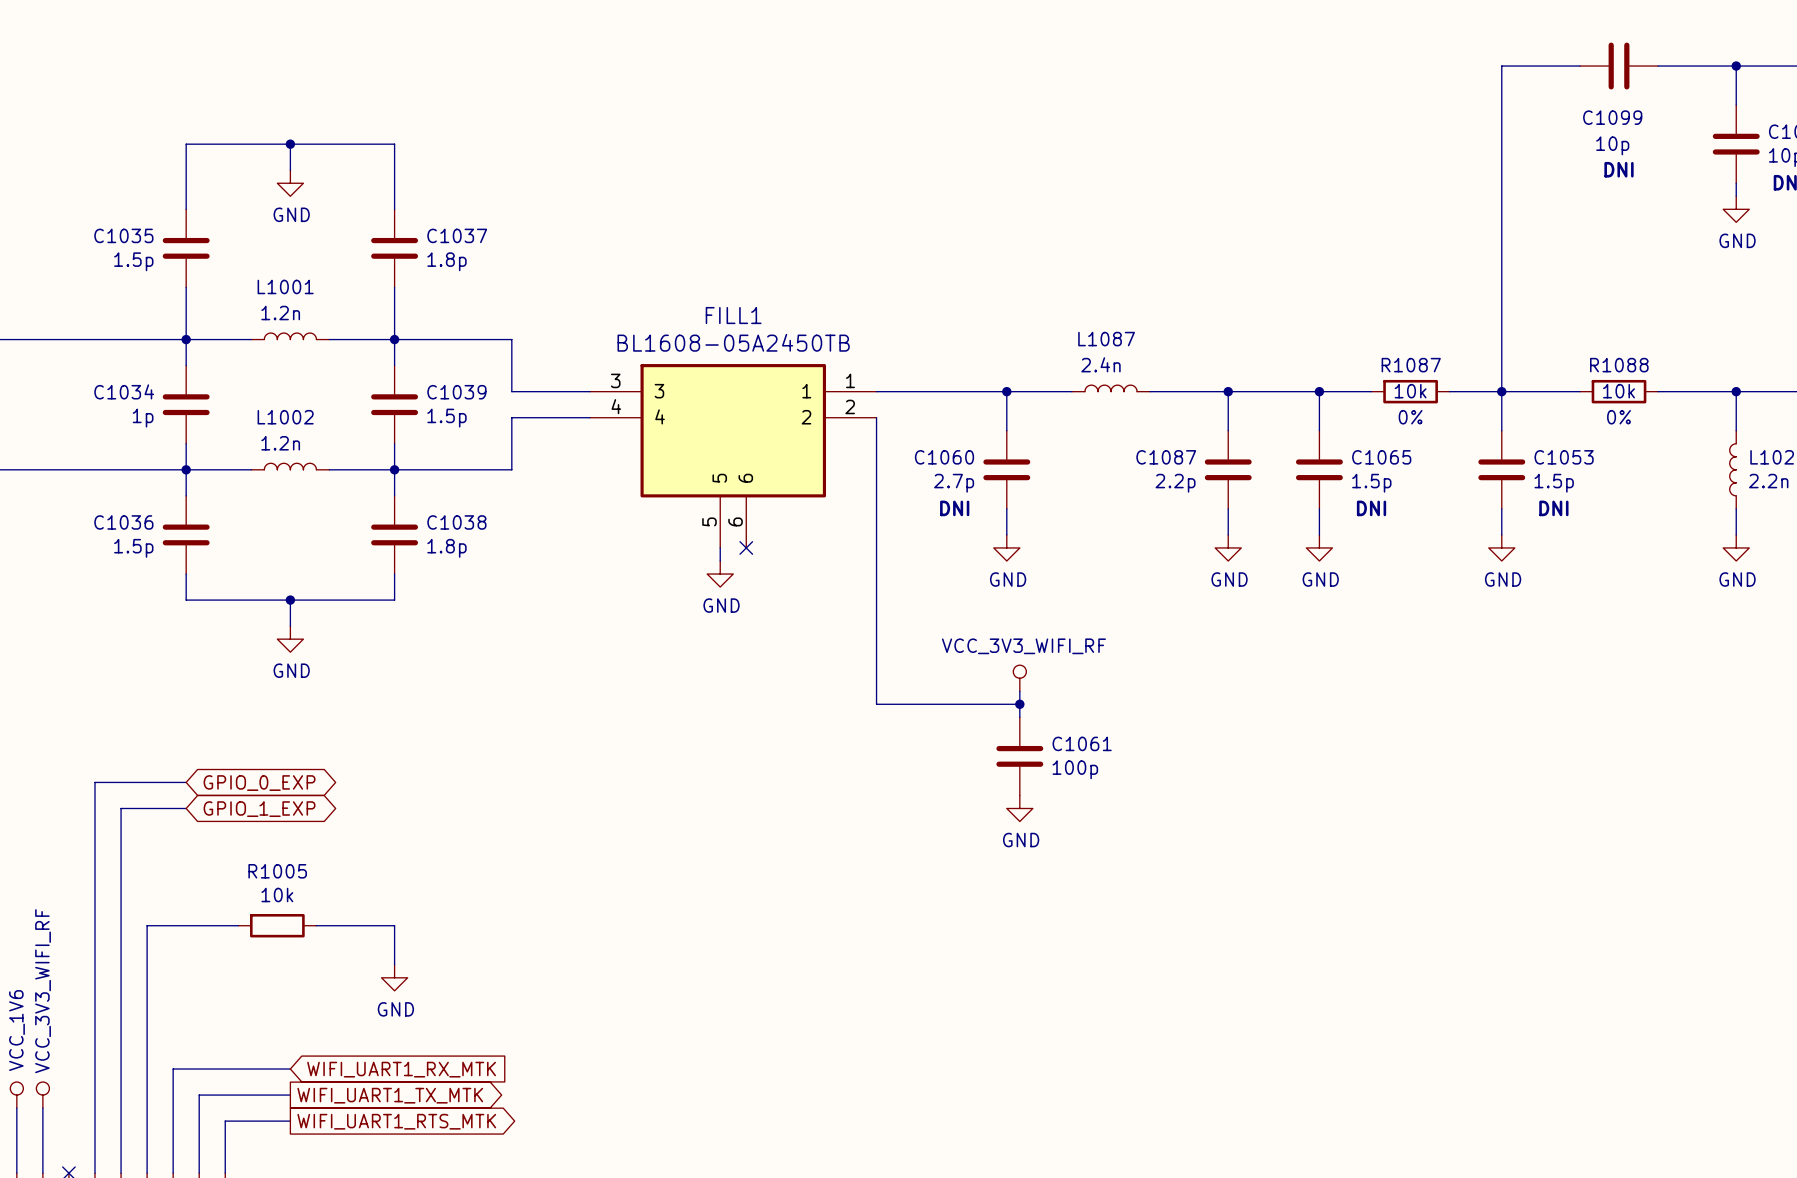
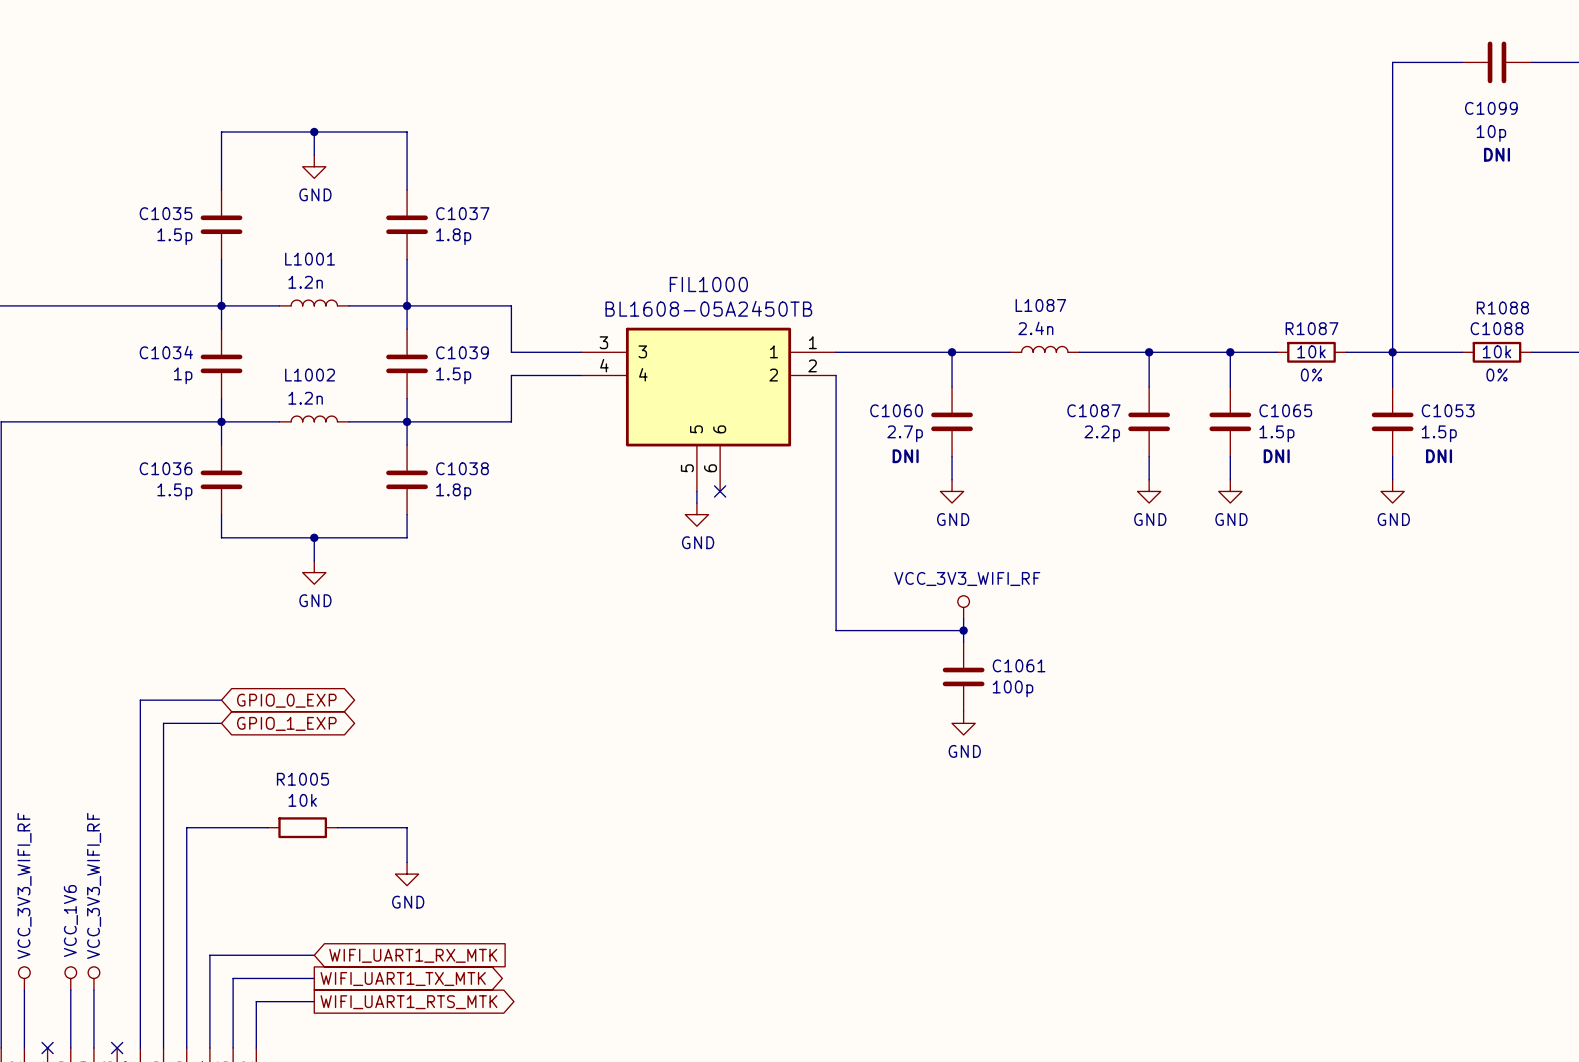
FILL1 name: FILL1 (733, 315) -> FIL1000 (708, 284)
text: none -> R1088 (1502, 308)
R1088 name: R1088 (1619, 365) -> C1088 (1497, 328)

